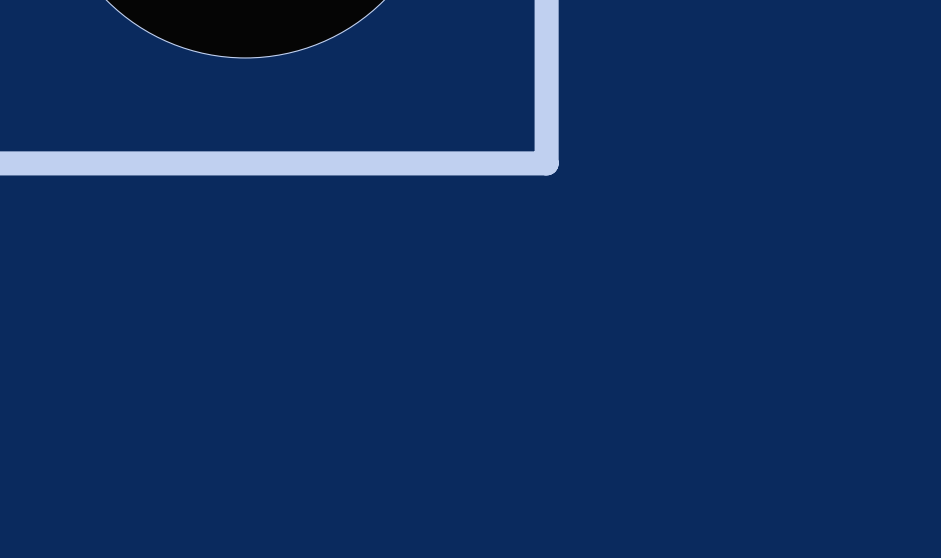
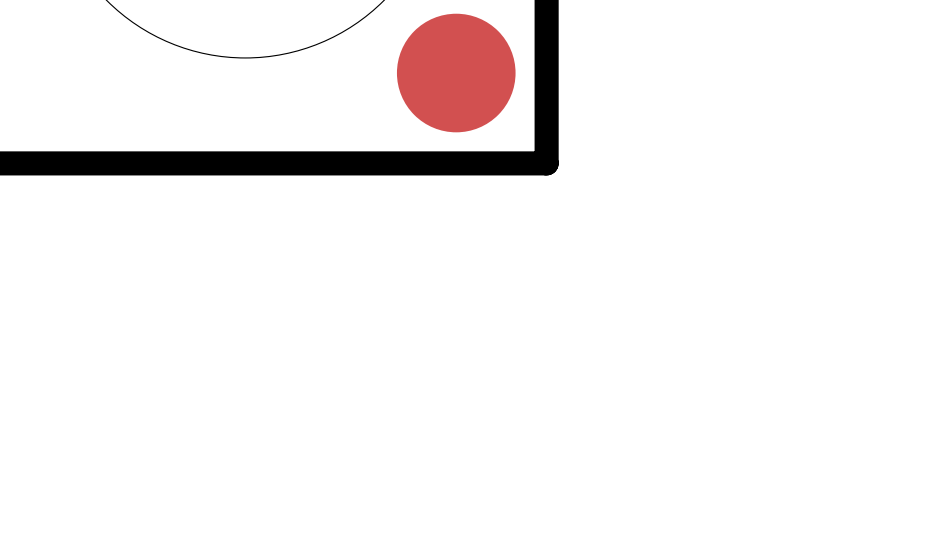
part: none -> (456, 73)

